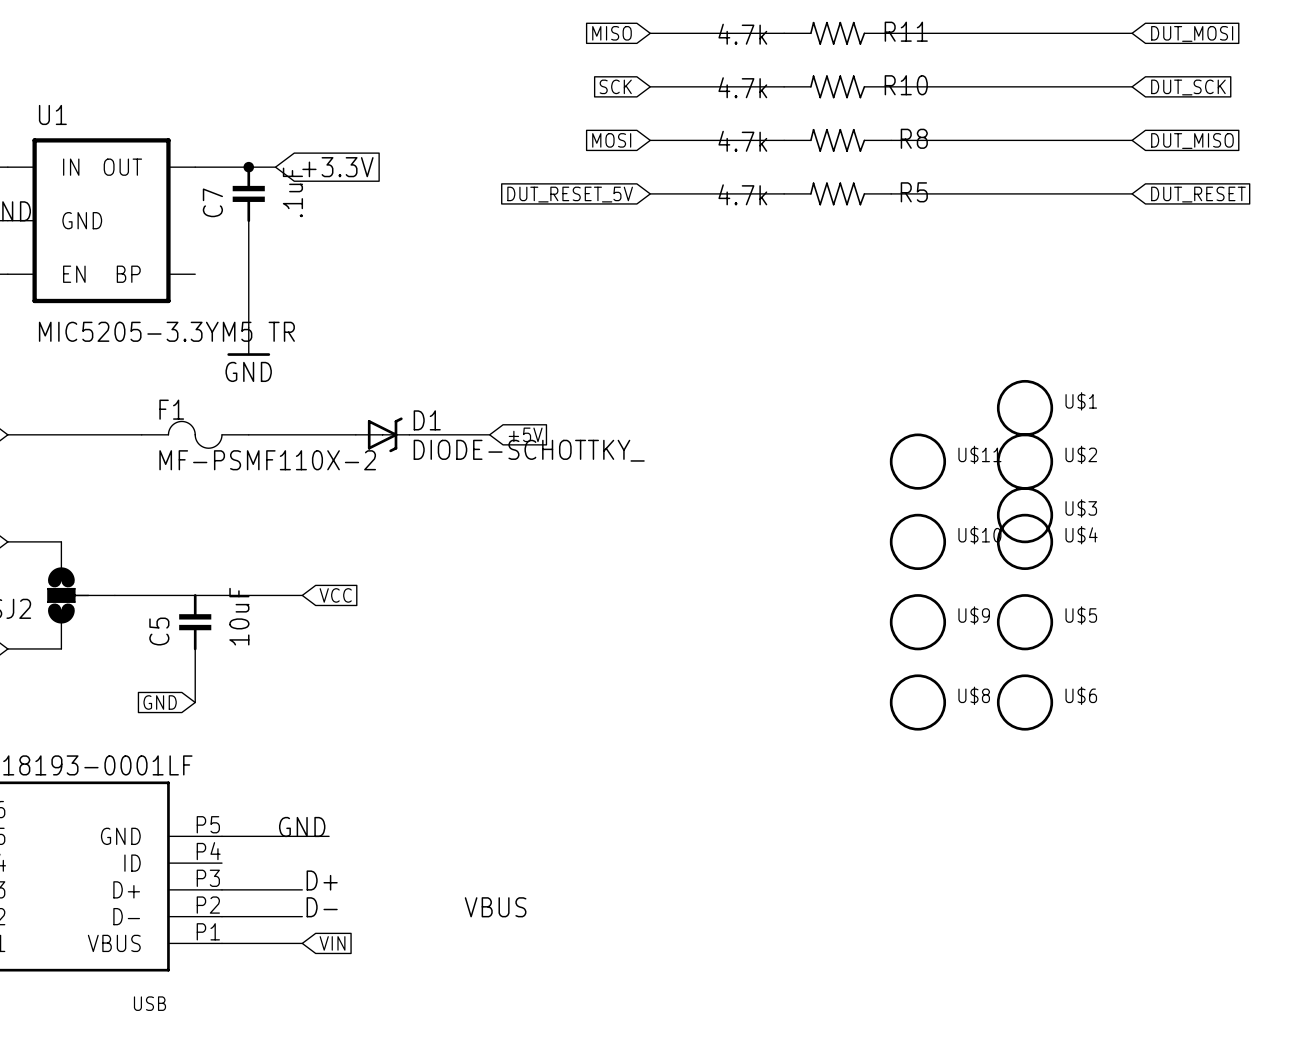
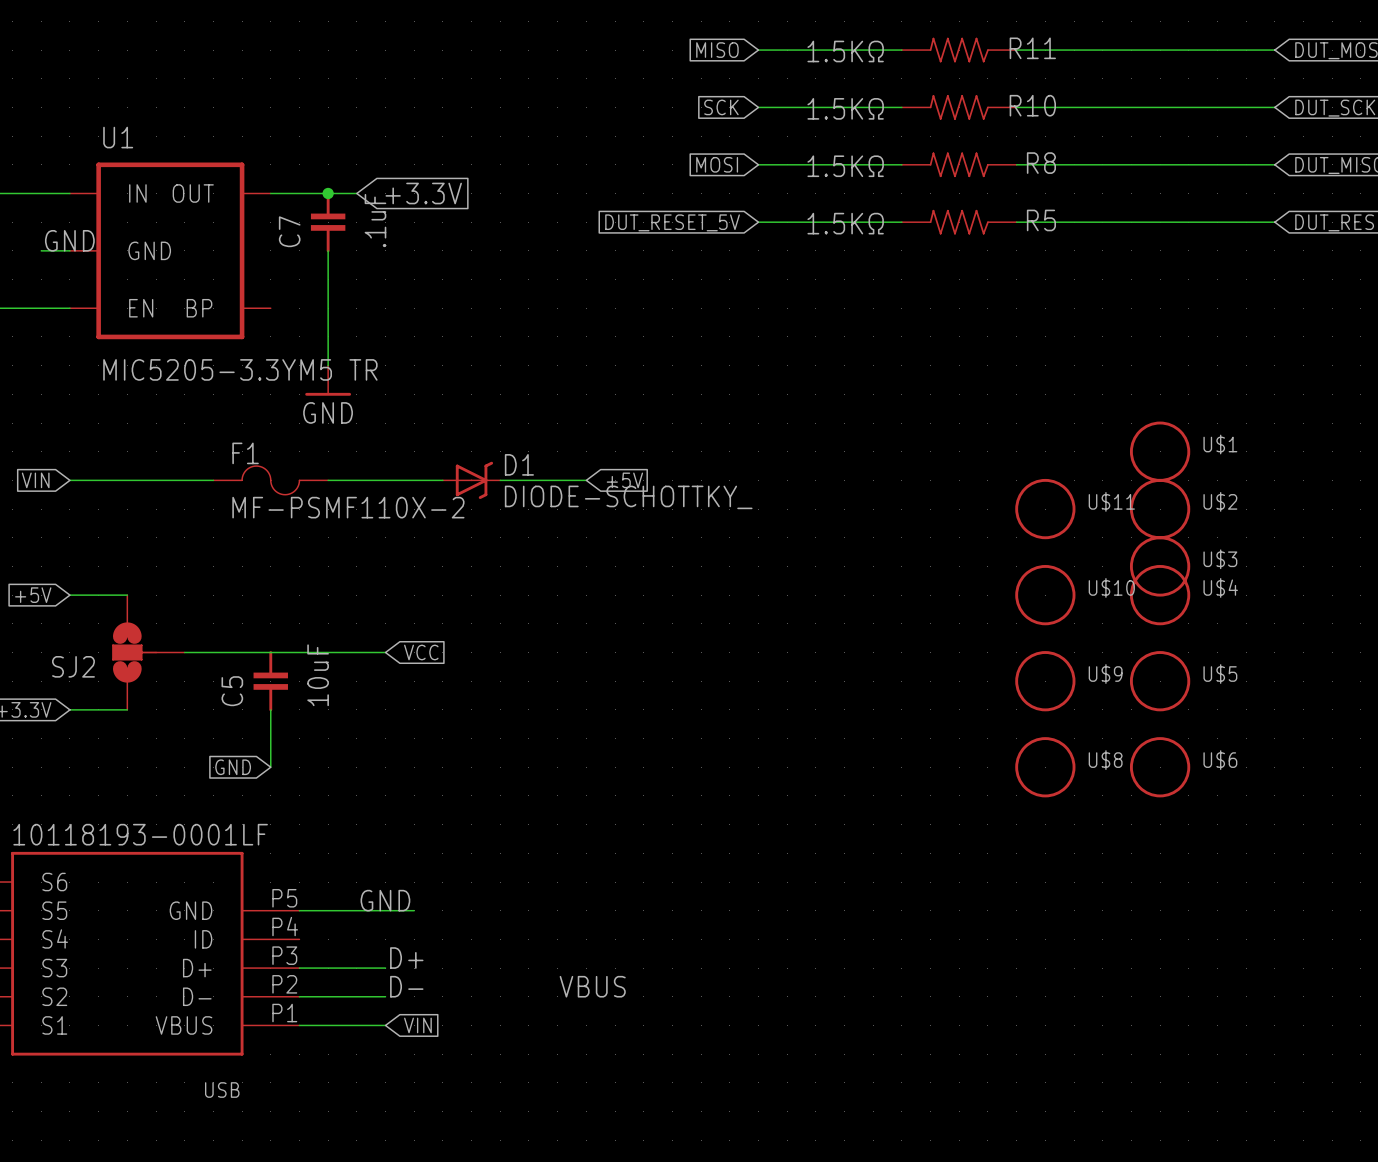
R11 value: 4.7k (742, 34) -> 1.5KΩ (845, 51)
R10 value: 4.7k (742, 87) -> 1.5KΩ (845, 108)
R8 value: 4.7k (742, 141) -> 1.5KΩ (845, 166)
R5 value: 4.7k (742, 194) -> 1.5KΩ (845, 223)

